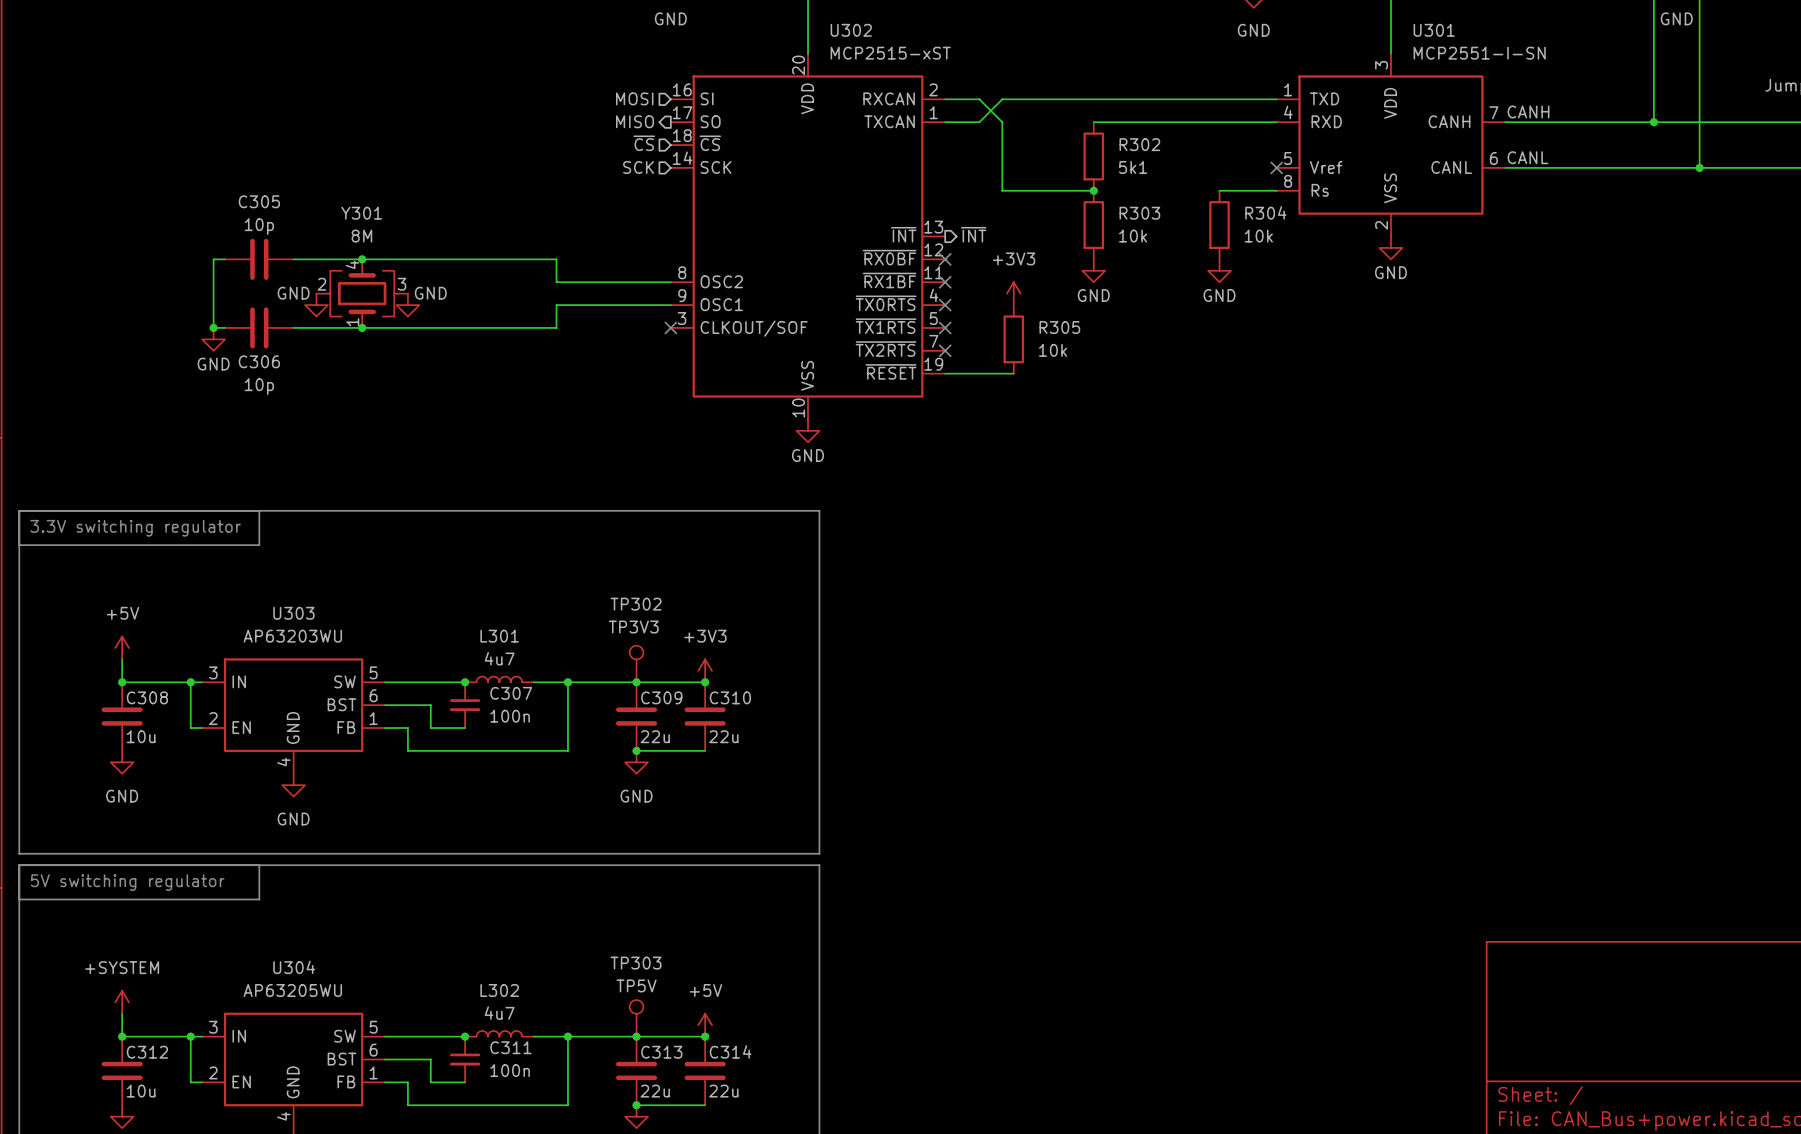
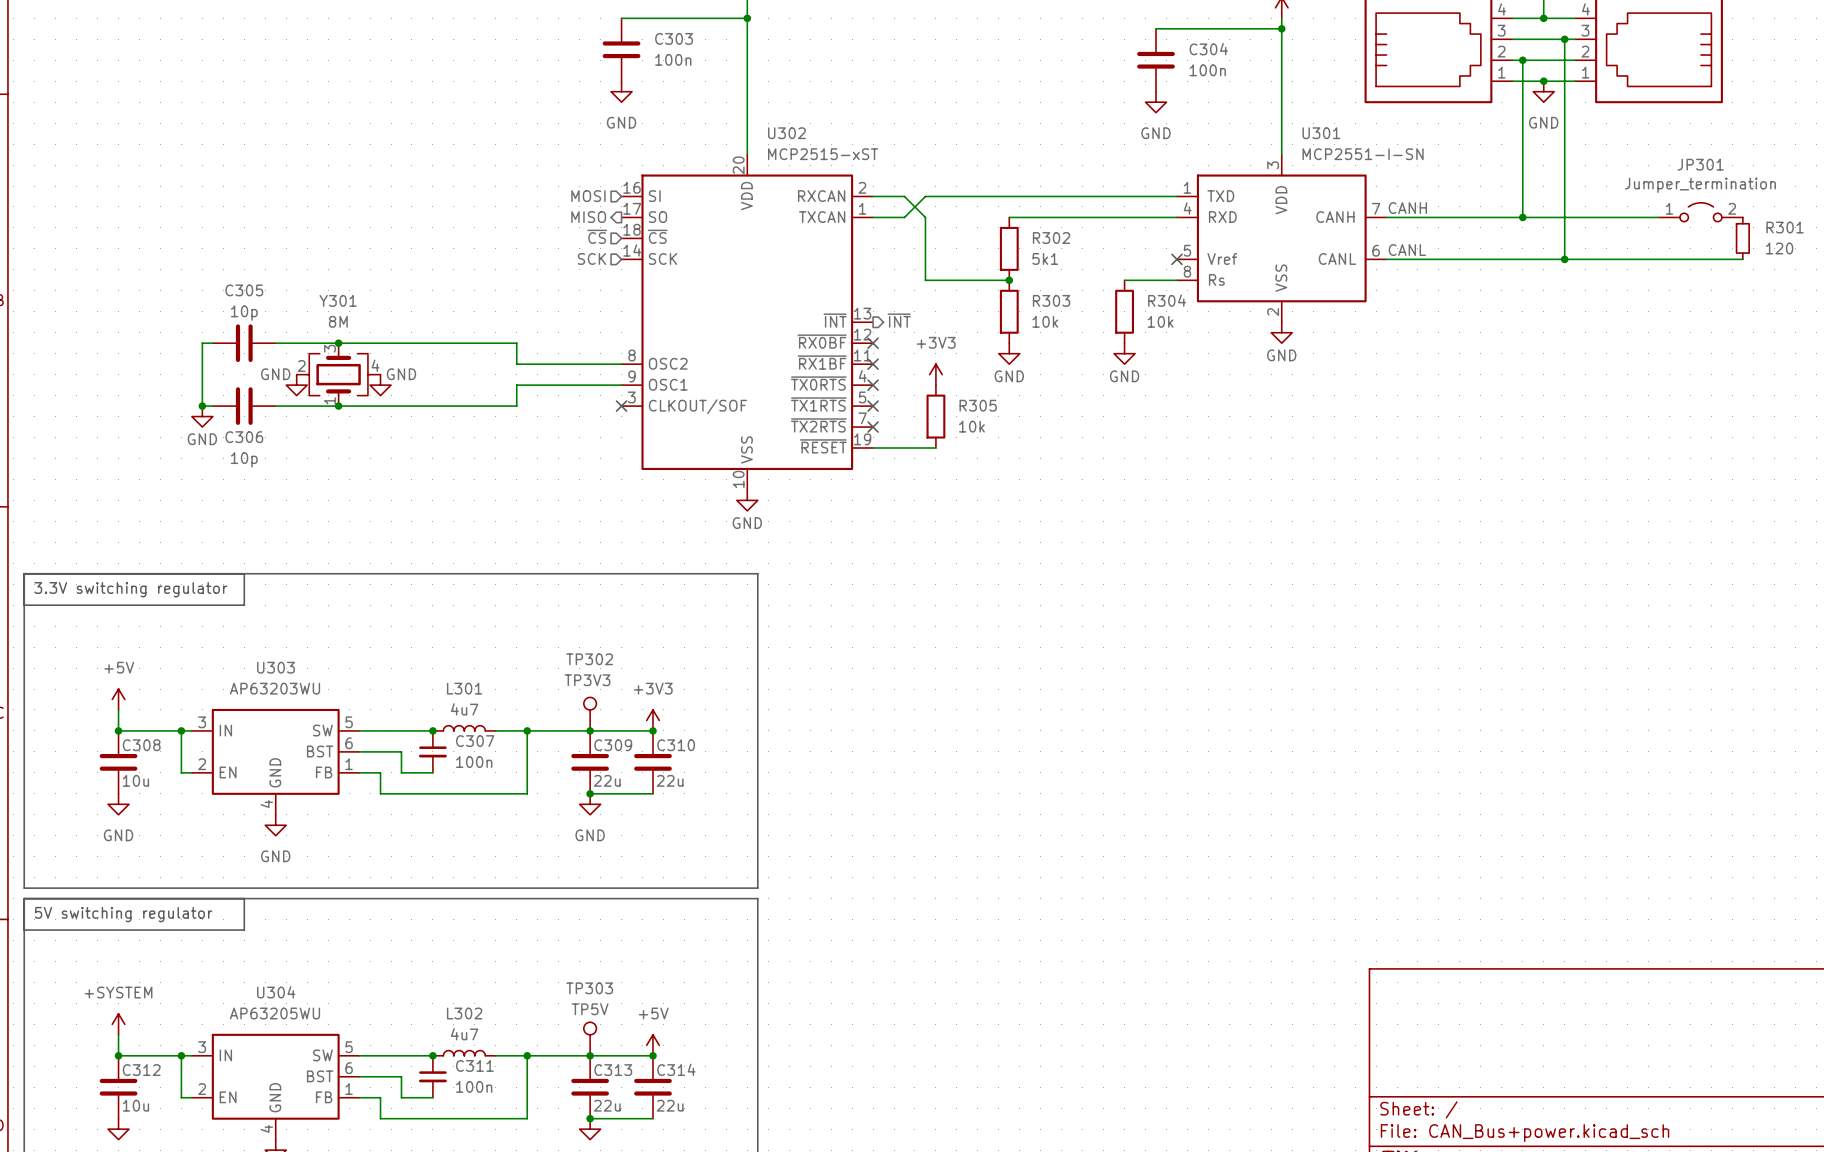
Y301 pin number: 4 (352, 264) -> 3 (329, 348)
Y301 pin number: 3 (401, 284) -> 4 (375, 365)

